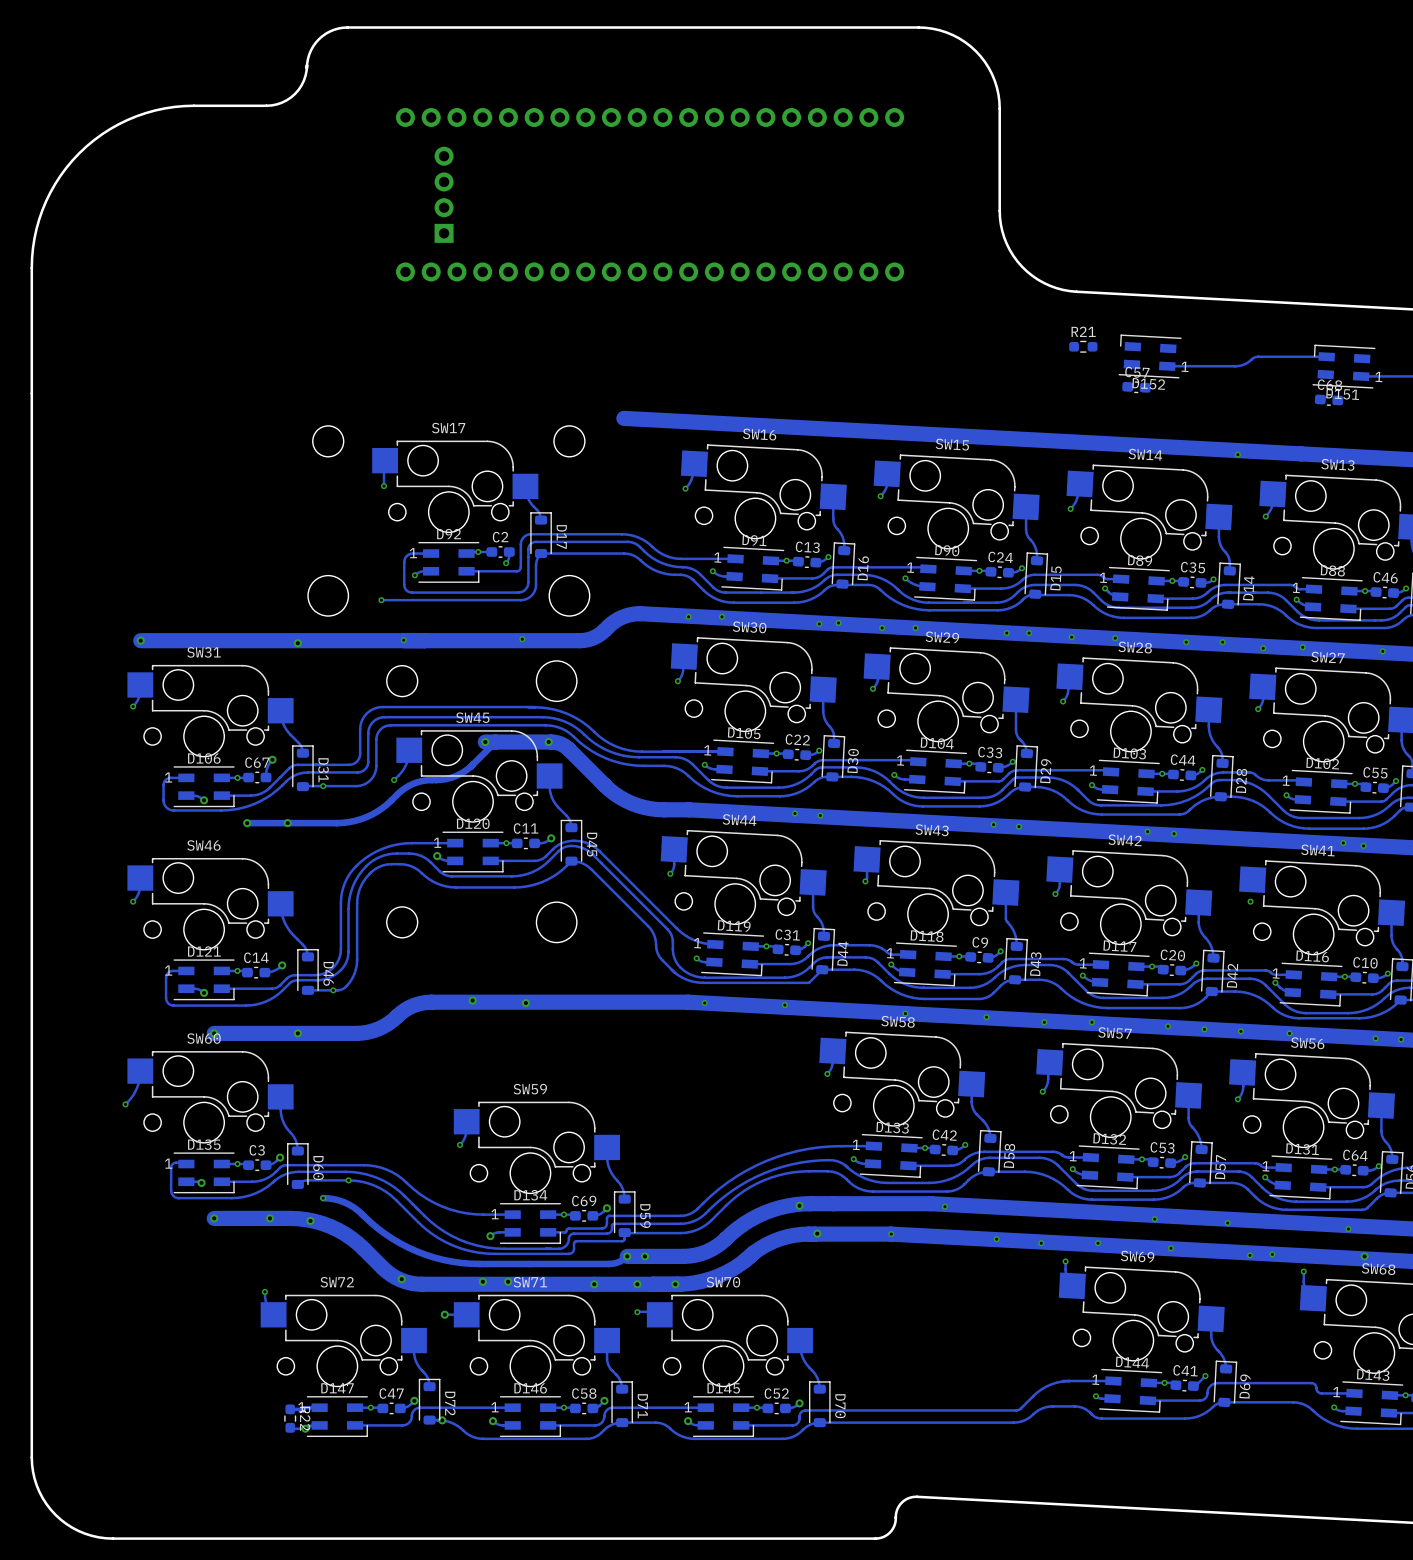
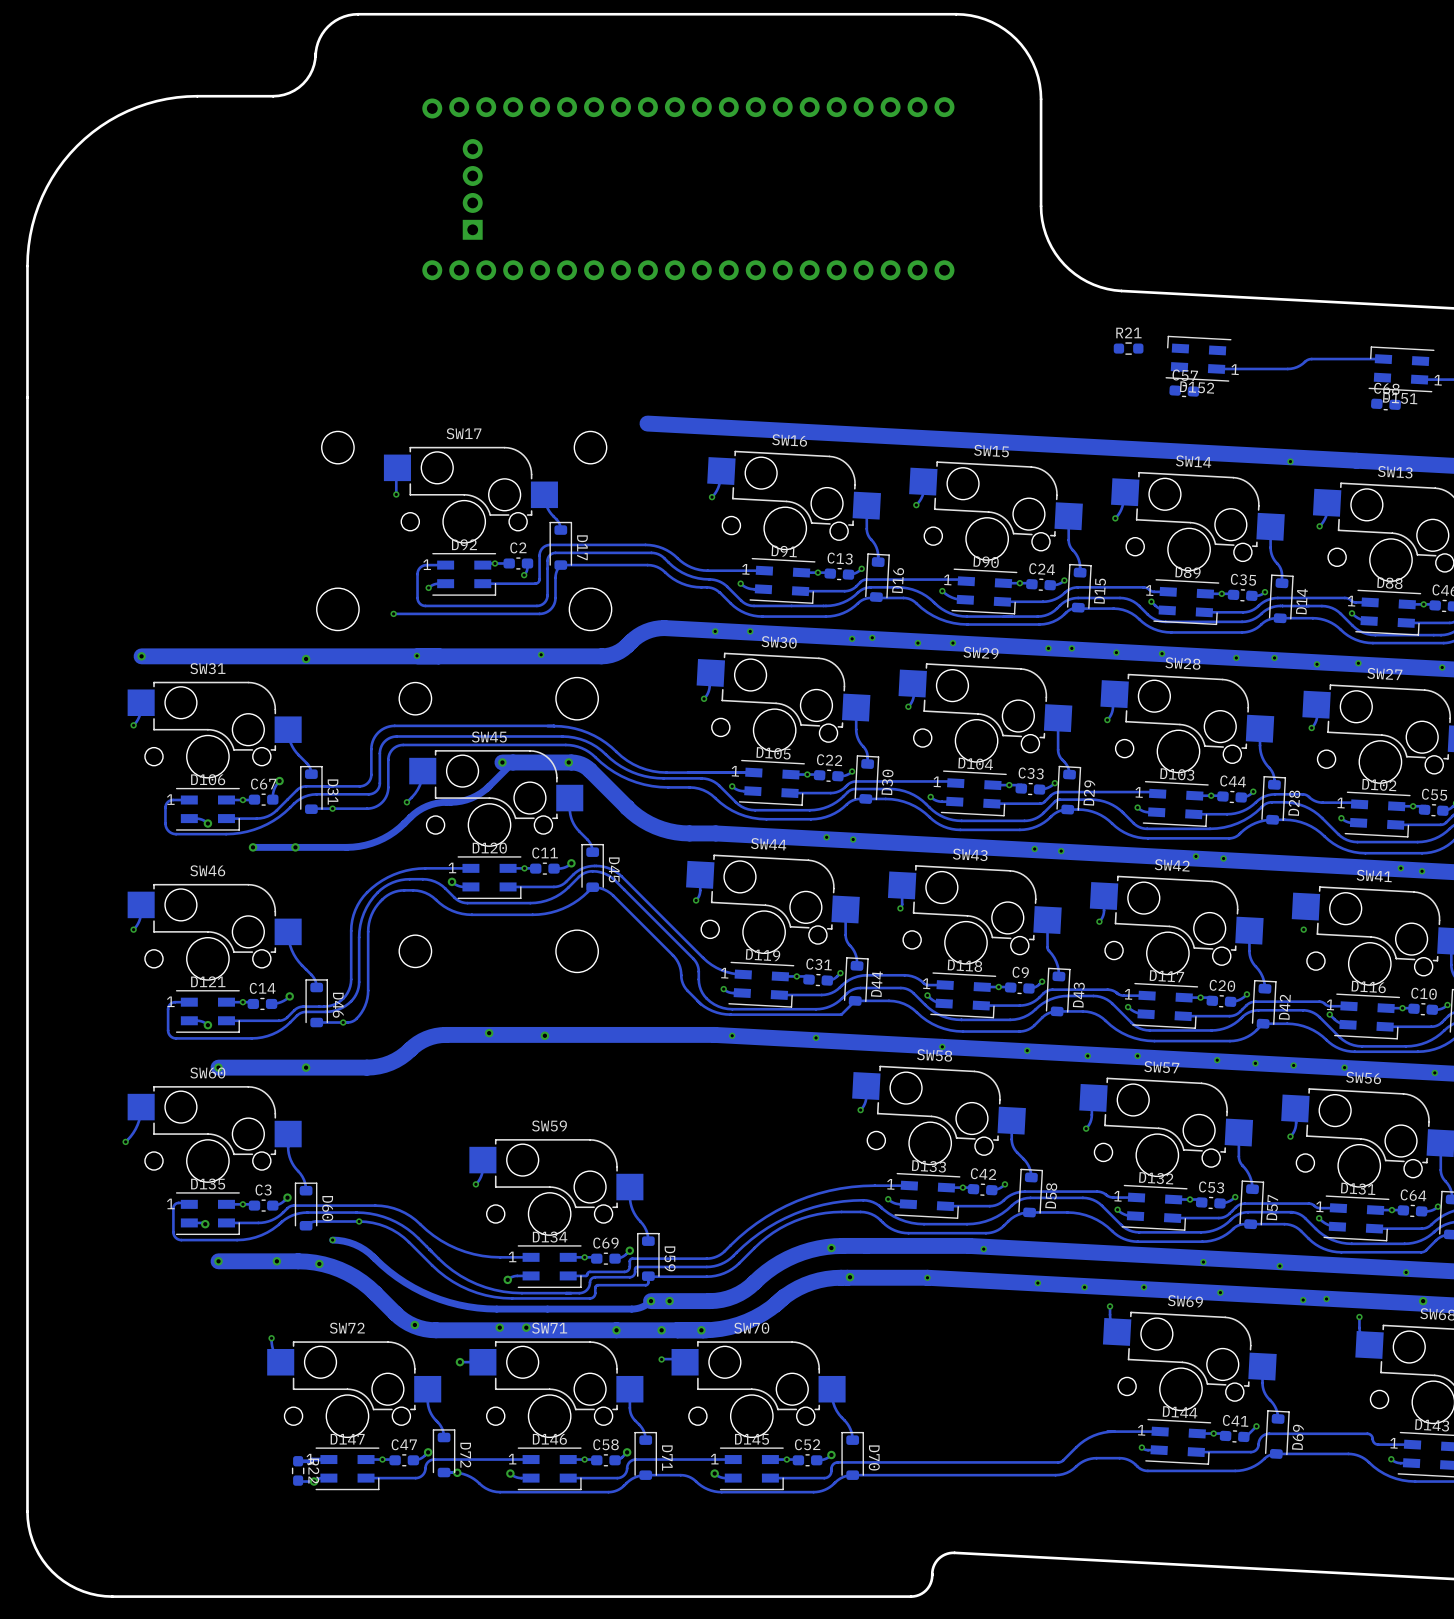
part: (650, 194) -> none
part: none -> (688, 188)

